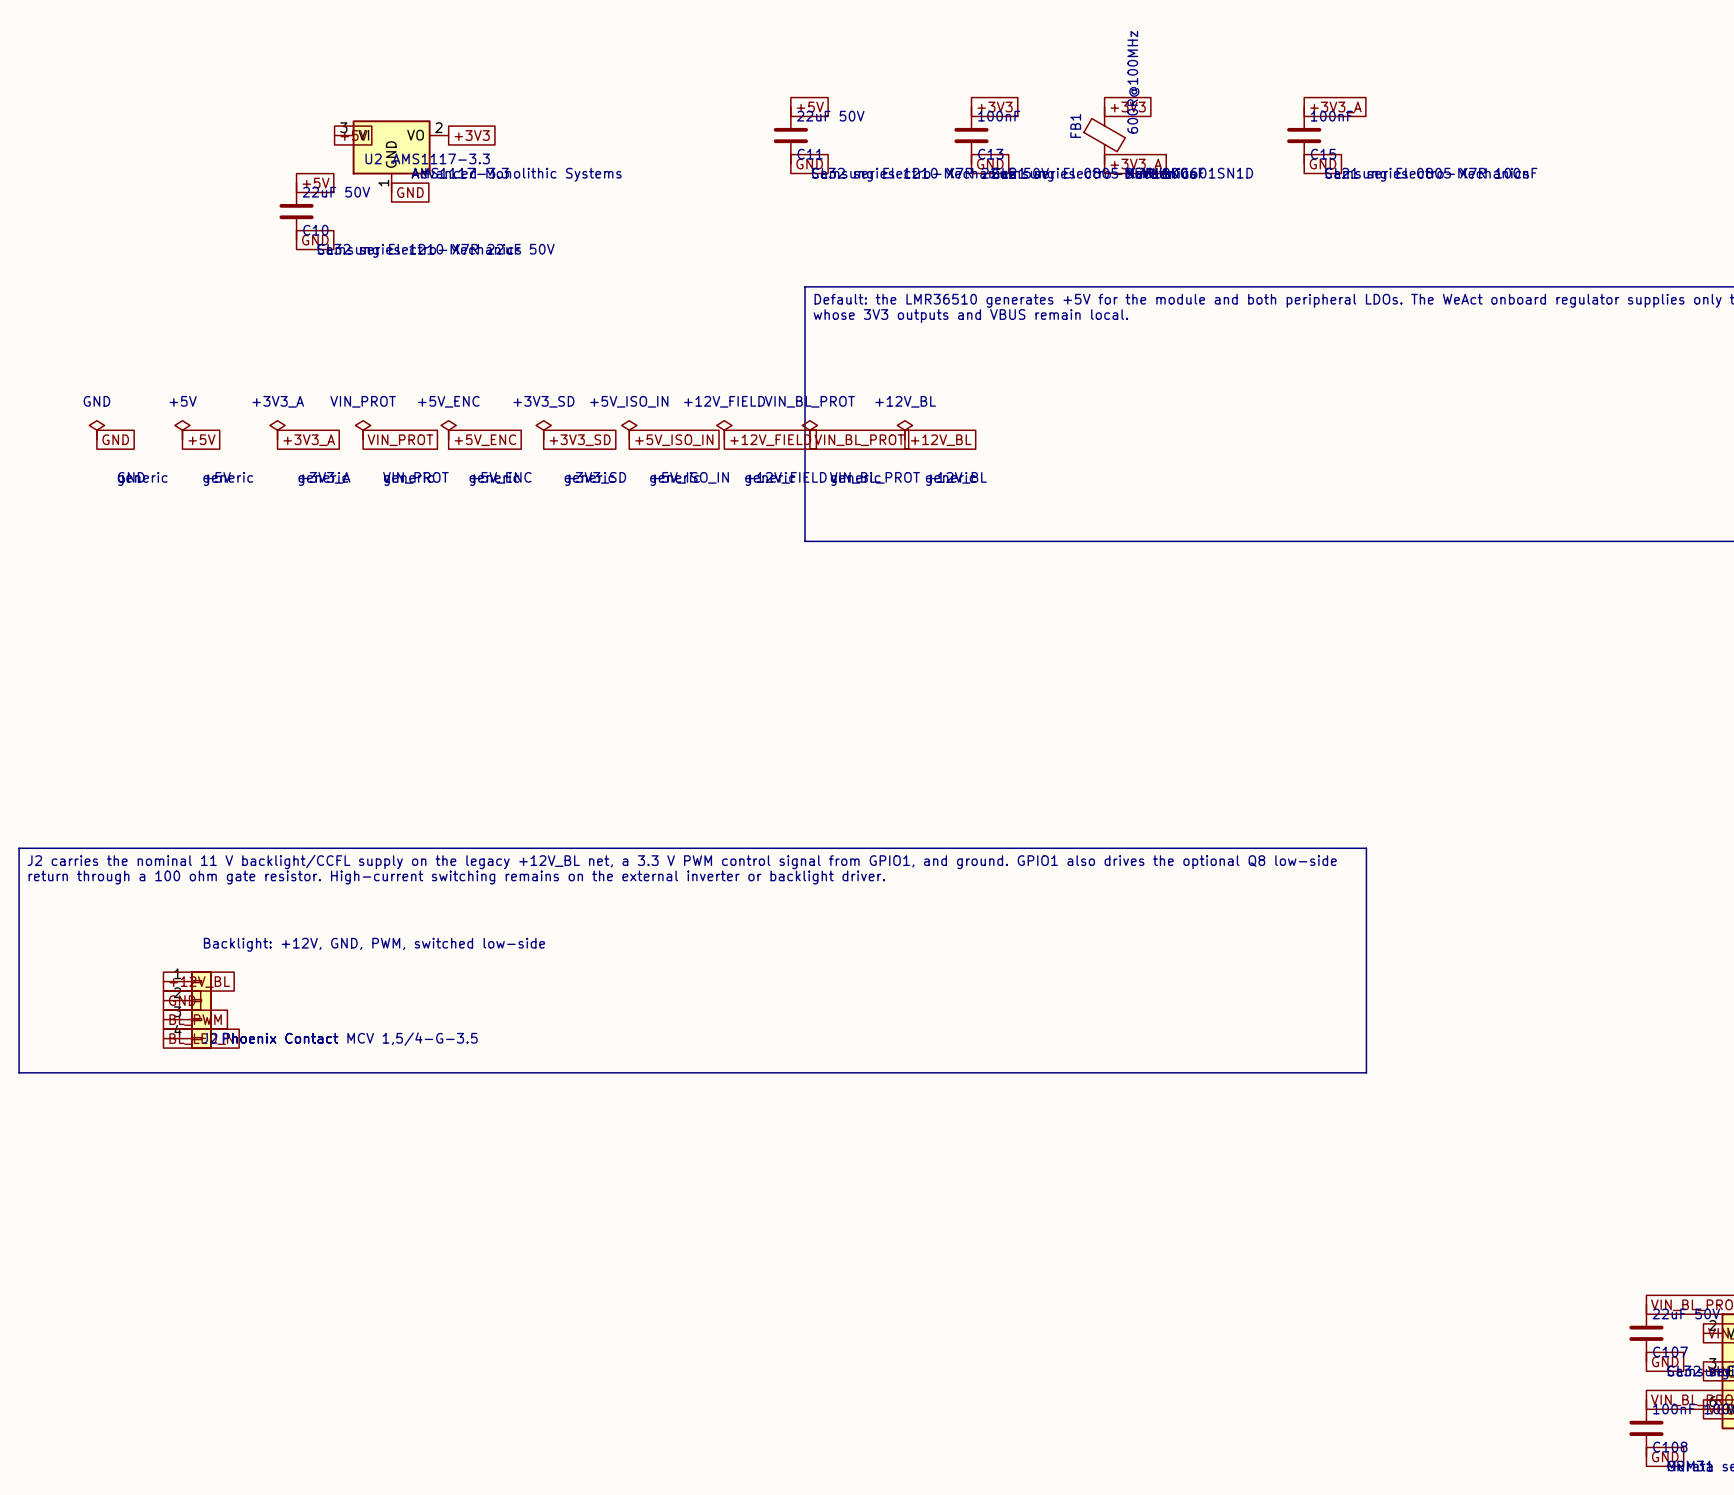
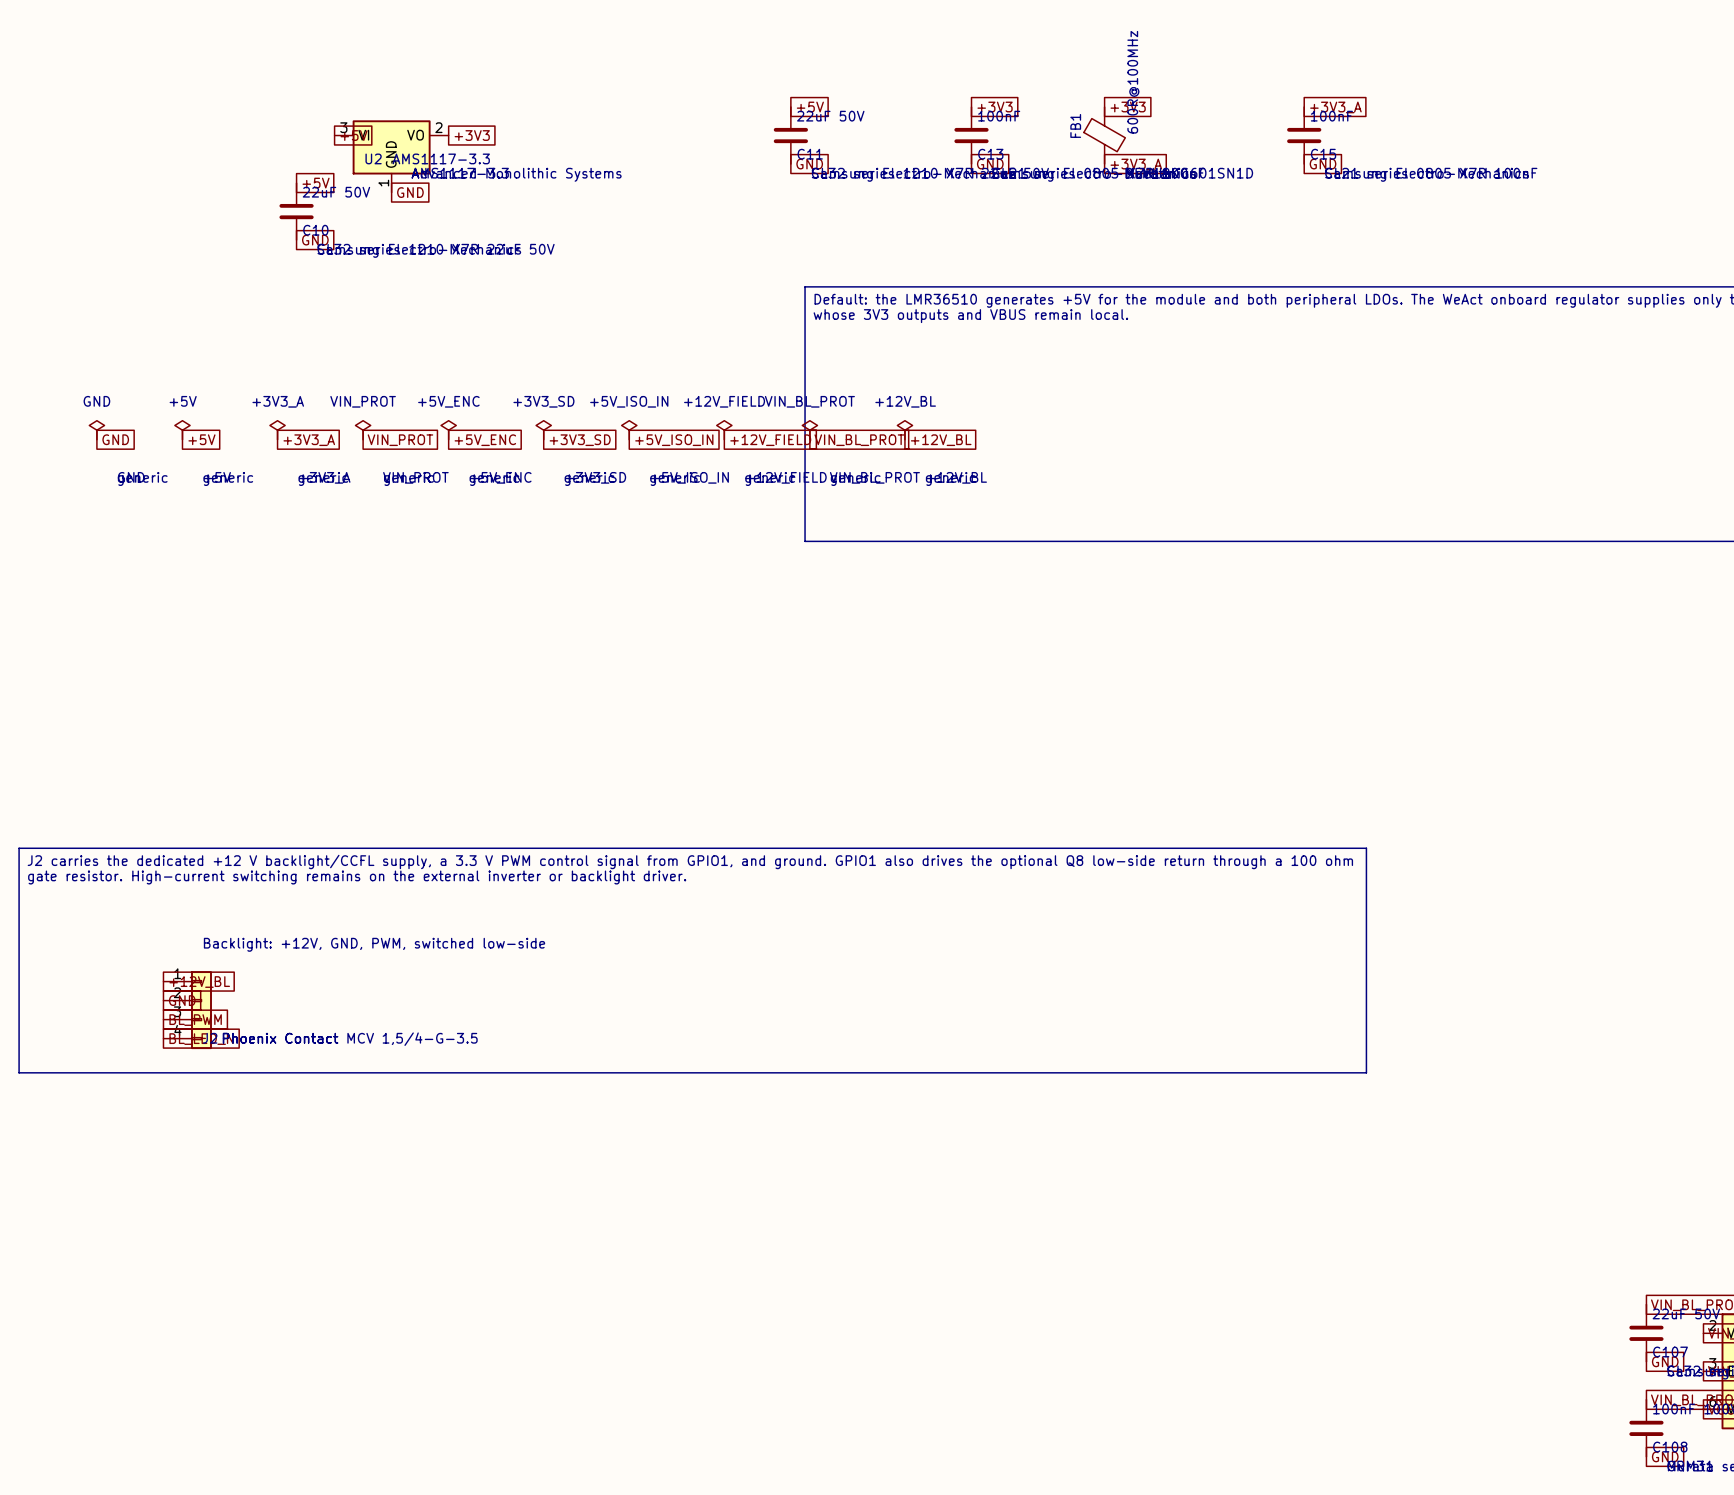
text: J2 carries the nominal 11 V backlight/CCFL supply on the legacy +12V_BL net, a 3.3 V PWM control signal from GPIO1, and ground. GPIO1 also drives the optional Q8 low-side (682, 861) -> J2 carries the dedicated +12 V backlight/CCFL supply, a 3.3 V PWM control signal from GPIO1, and ground. GPIO1 also drives the optional Q8 low-side return through a 100 ohm (690, 861)
text: return through a 100 ohm gate resistor. High-current switching remains on the external inverter or backlight driver. (456, 877) -> gate resistor. High-current switching remains on the external inverter or backlight driver. (357, 877)

